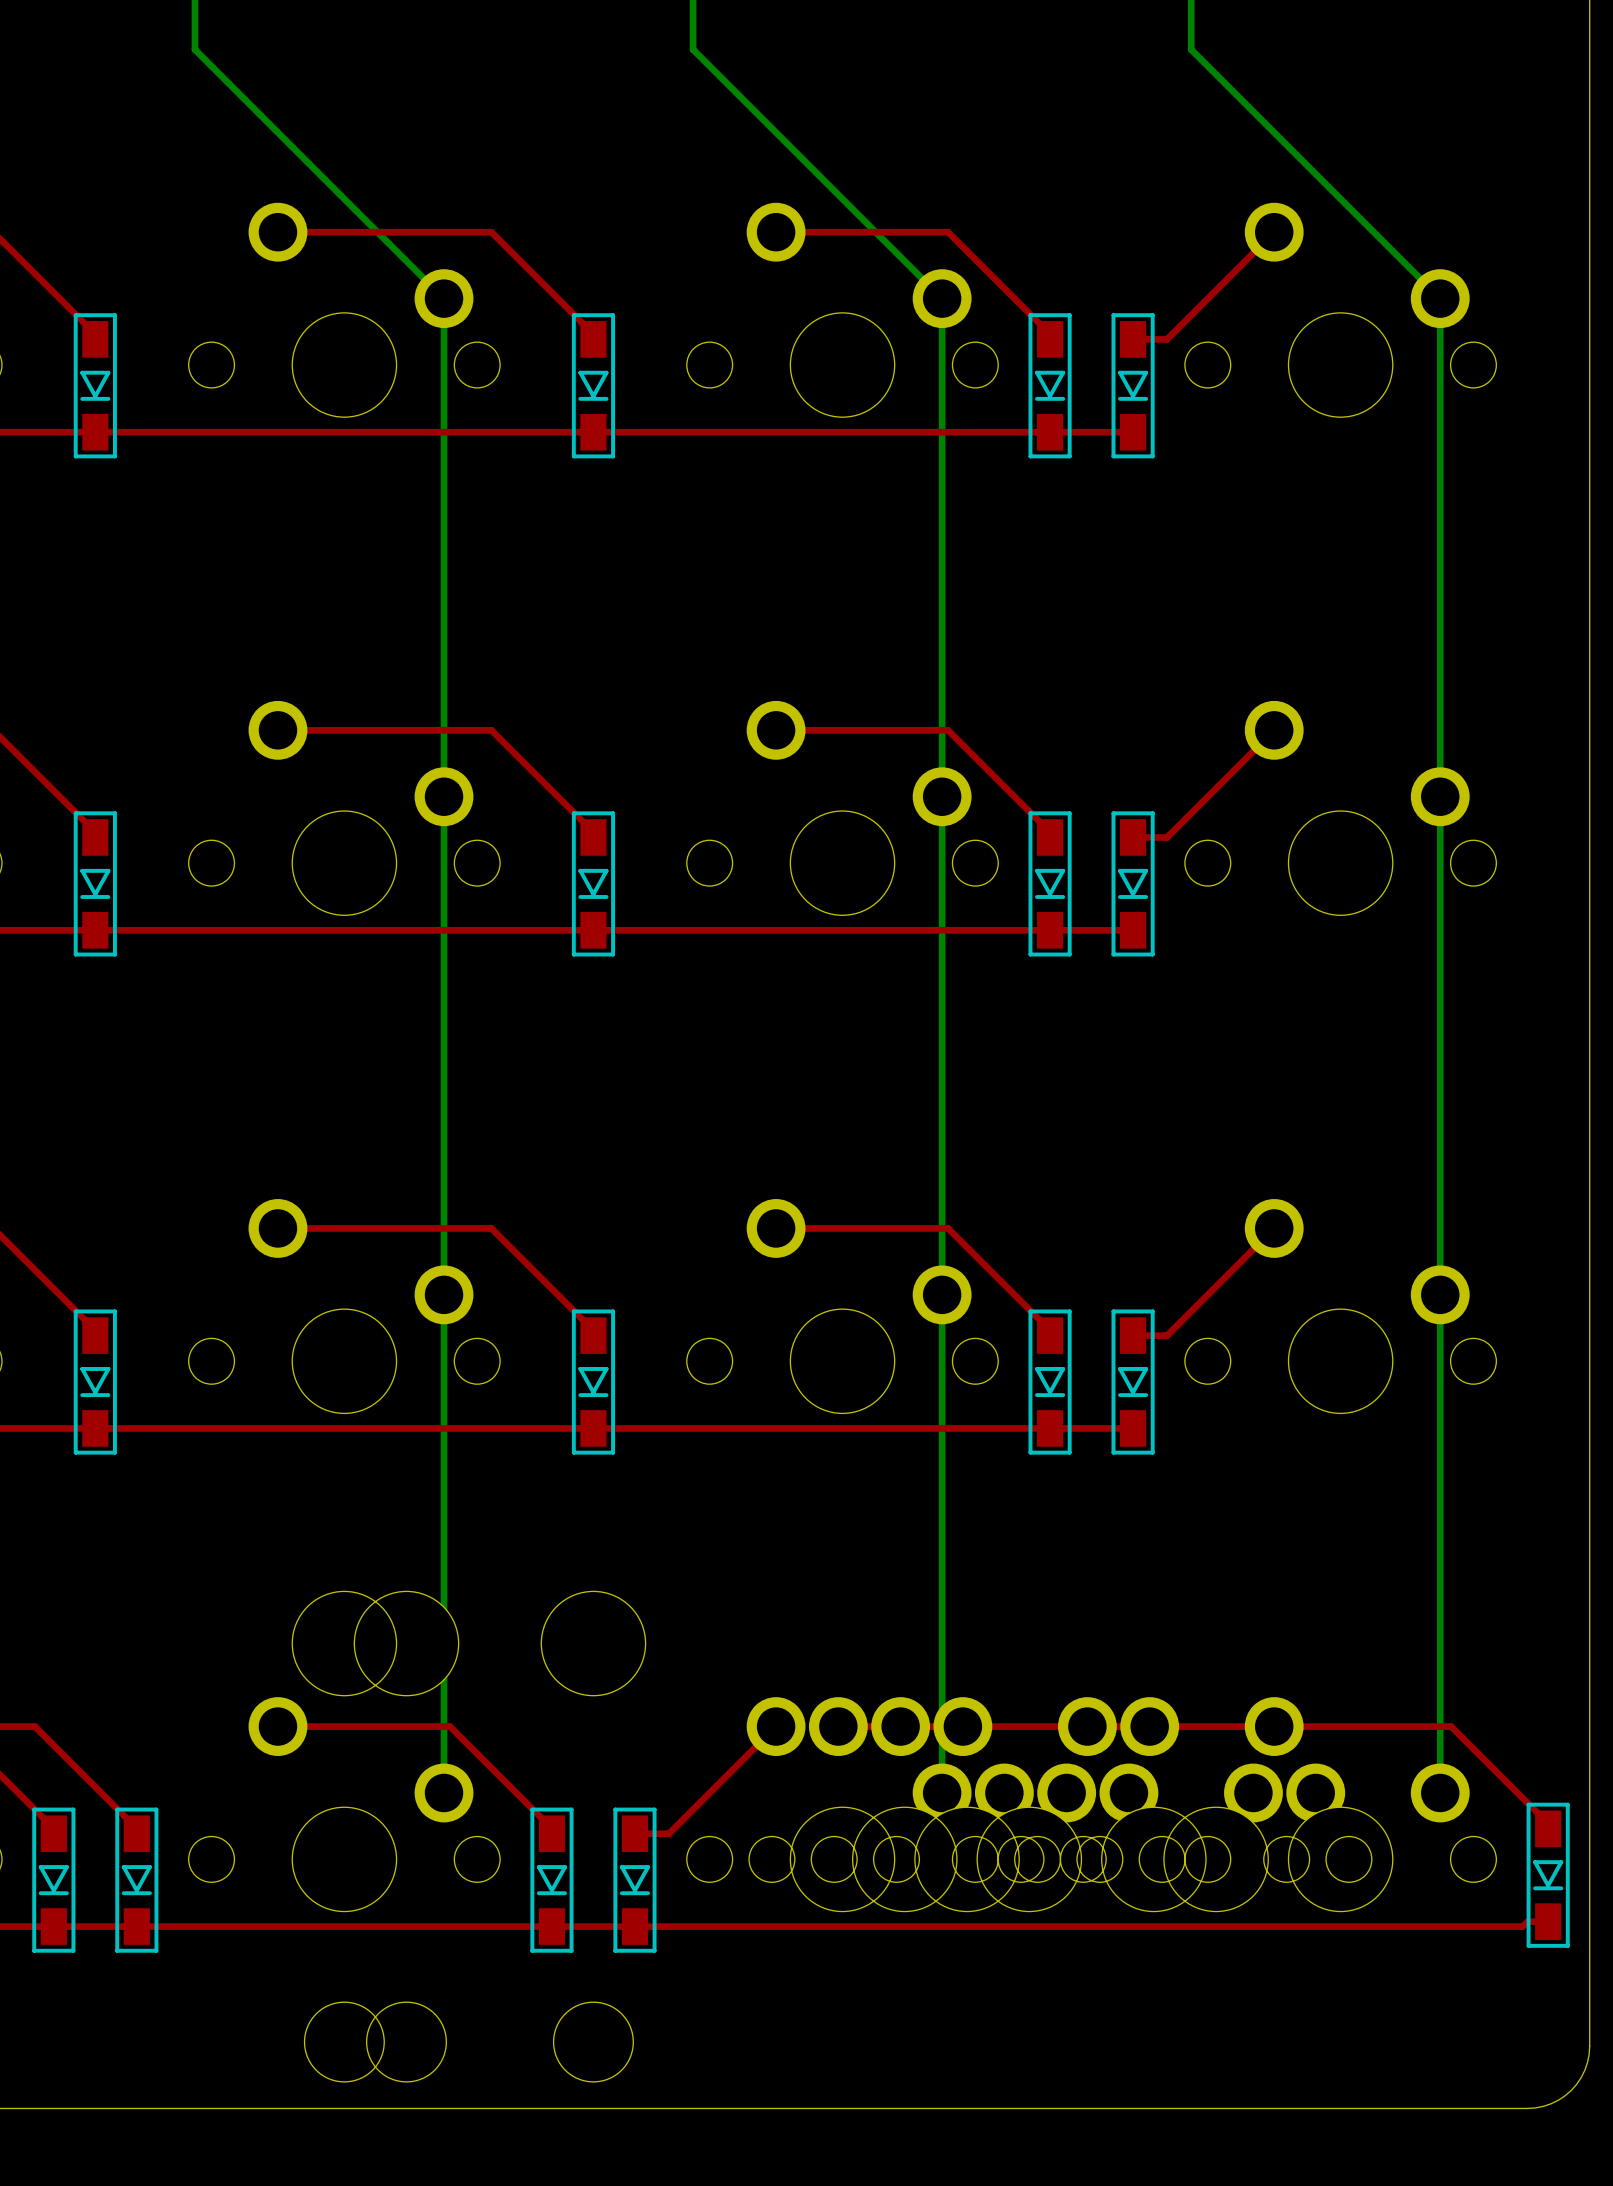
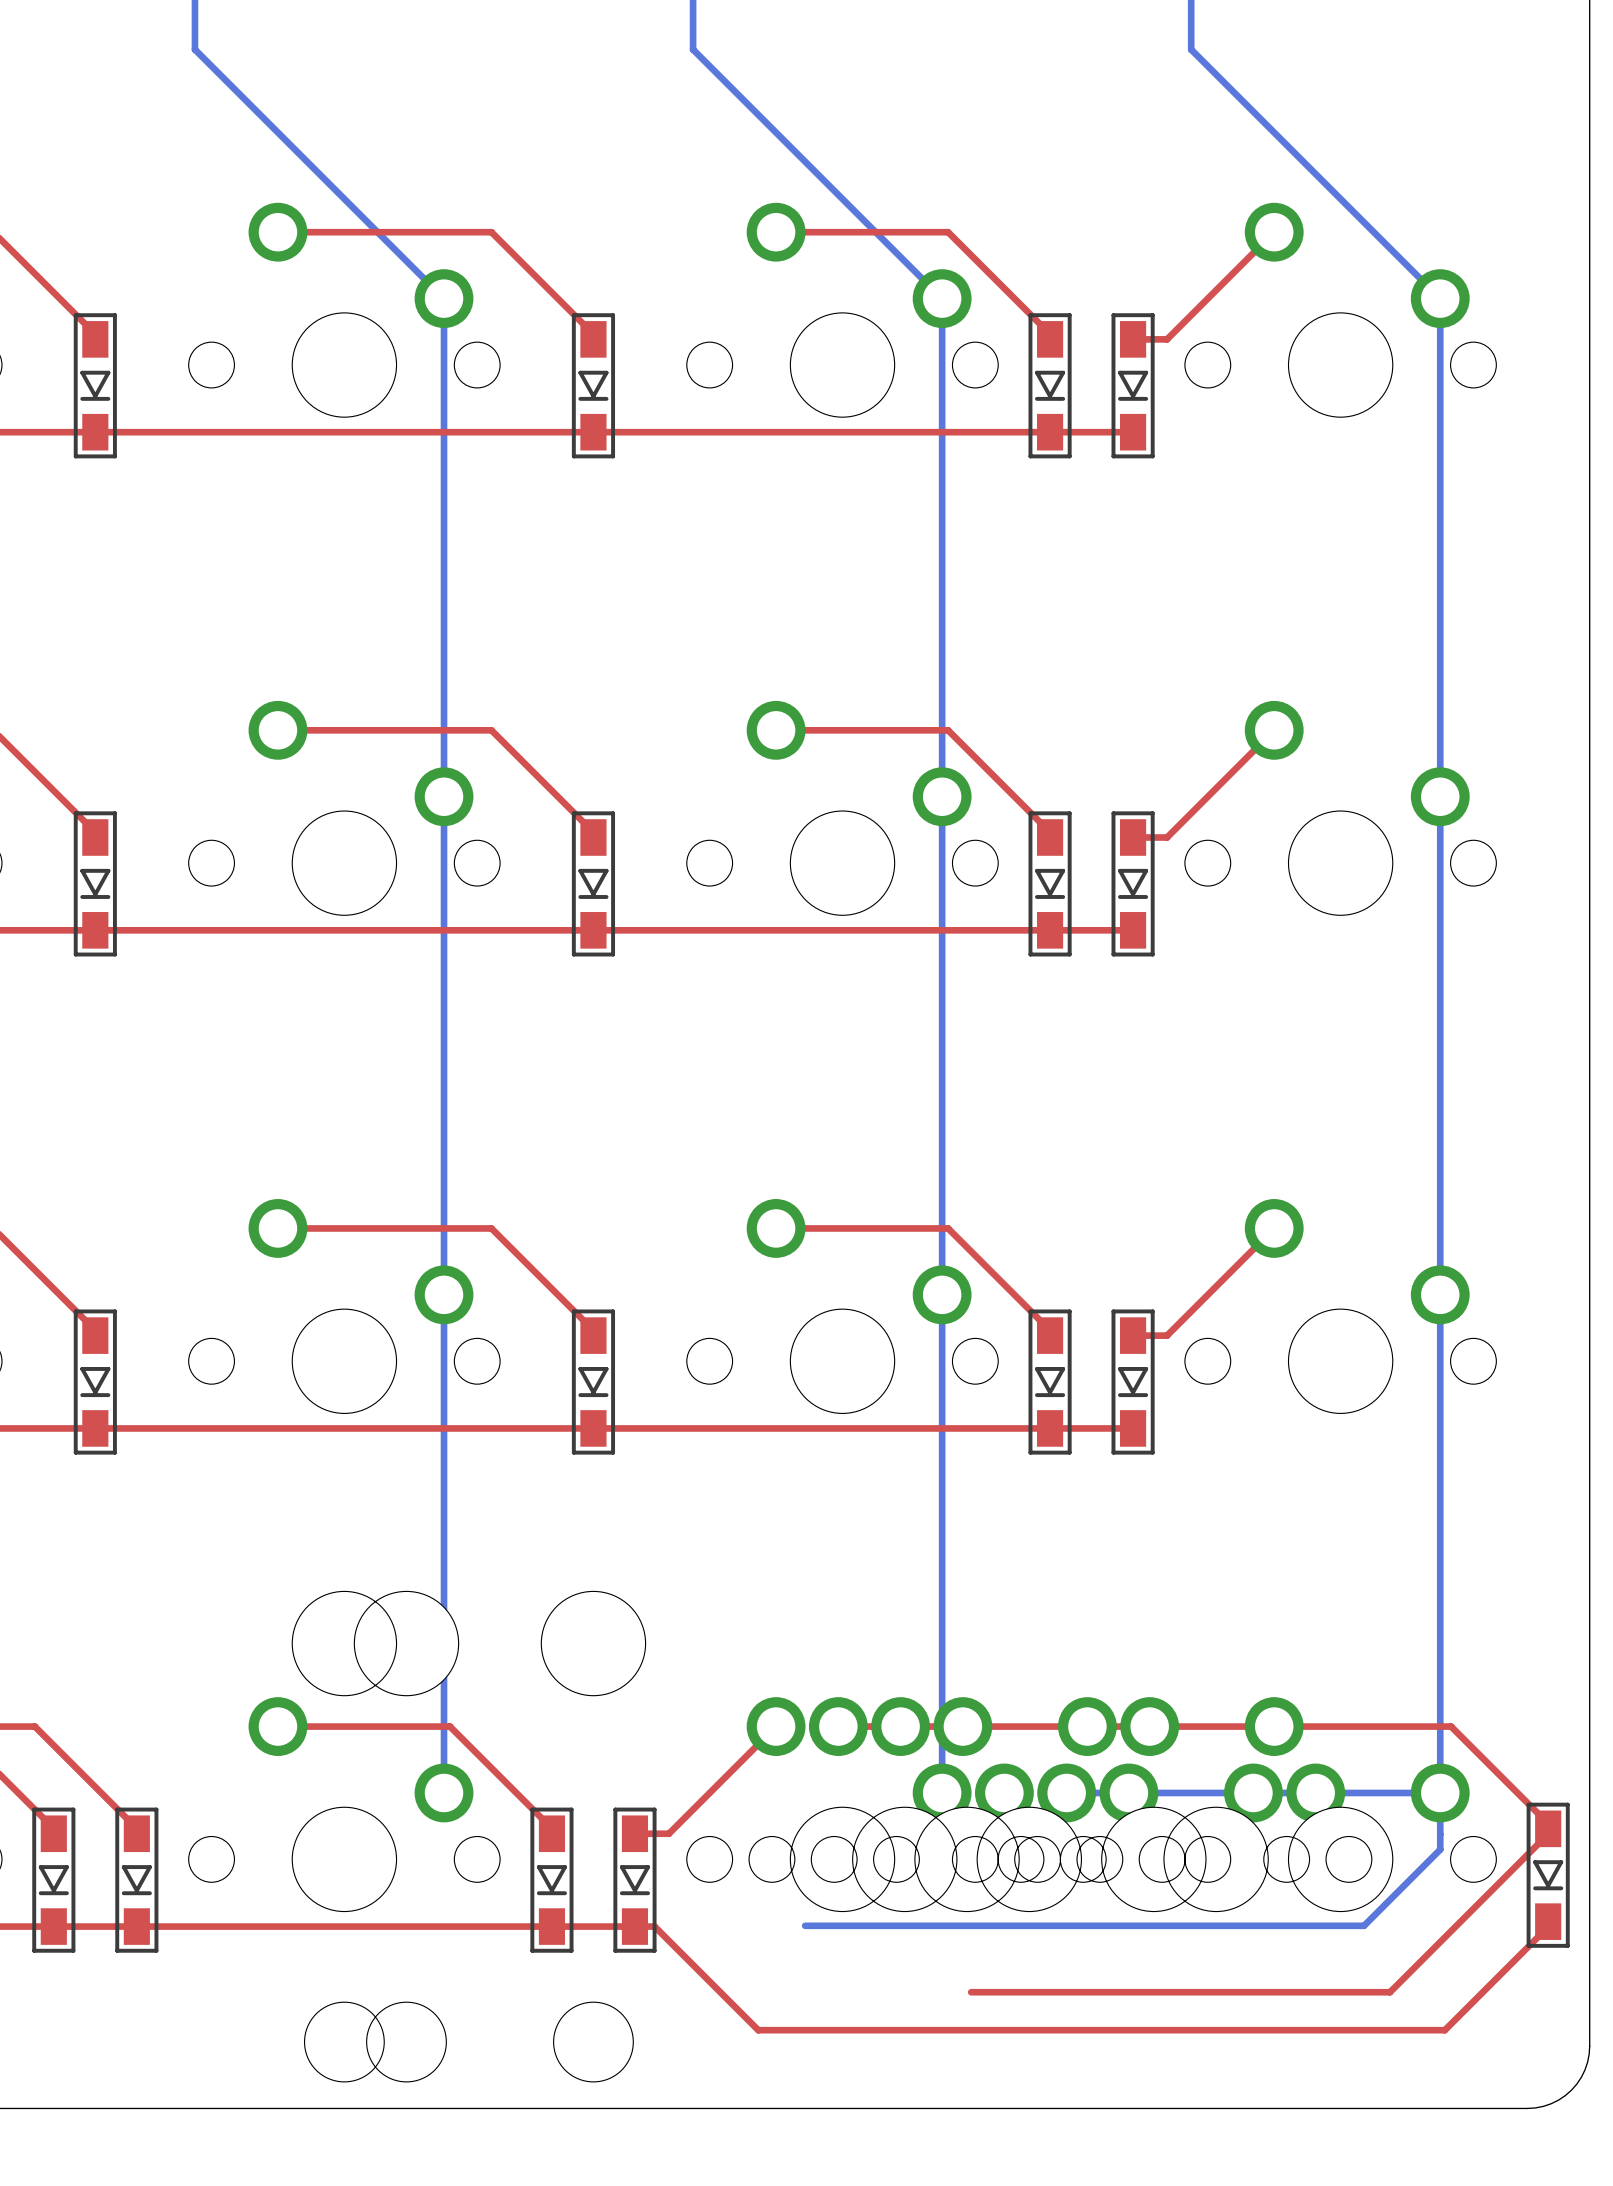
bottom track: none -> (1066, 1792) (1440, 1792) (1440, 1849) (1364, 1925) (805, 1925)
top track: none -> (1548, 1828) (1548, 1834) (1390, 1992) (971, 1992)
top track: (1548, 1921) (1527, 1921) (1522, 1926) (654, 1926) -> (1548, 1921) (1548, 1926) (1444, 2030) (758, 2030) (654, 1926)

